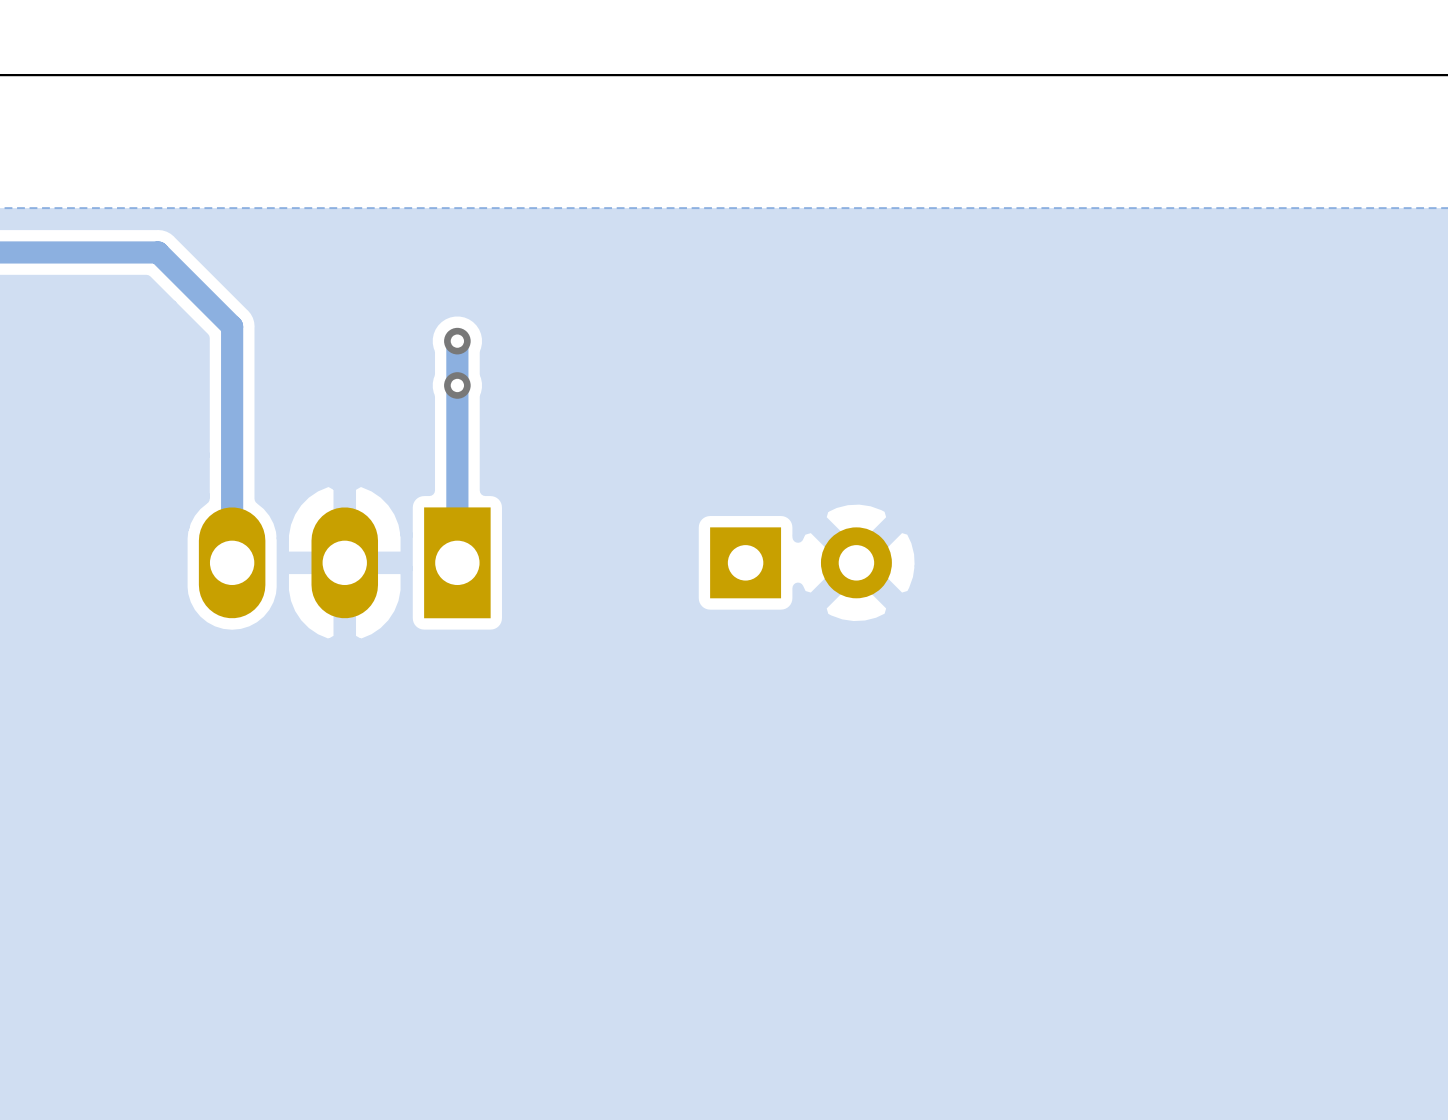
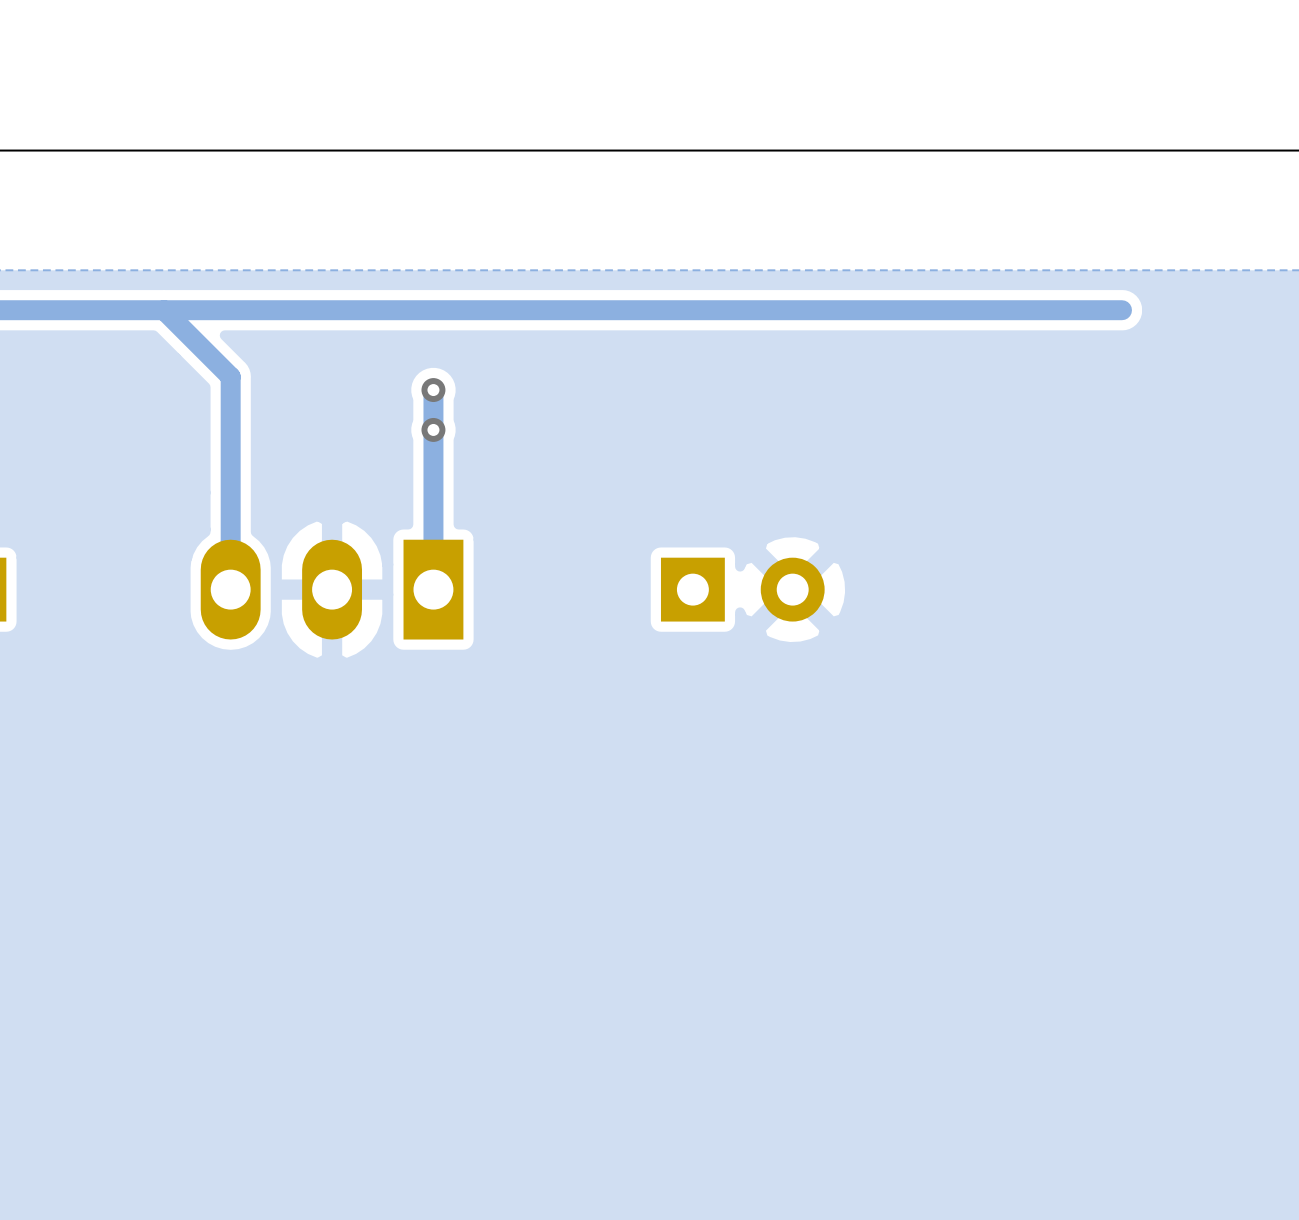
track: none -> (1122, 310) (164, 310)

